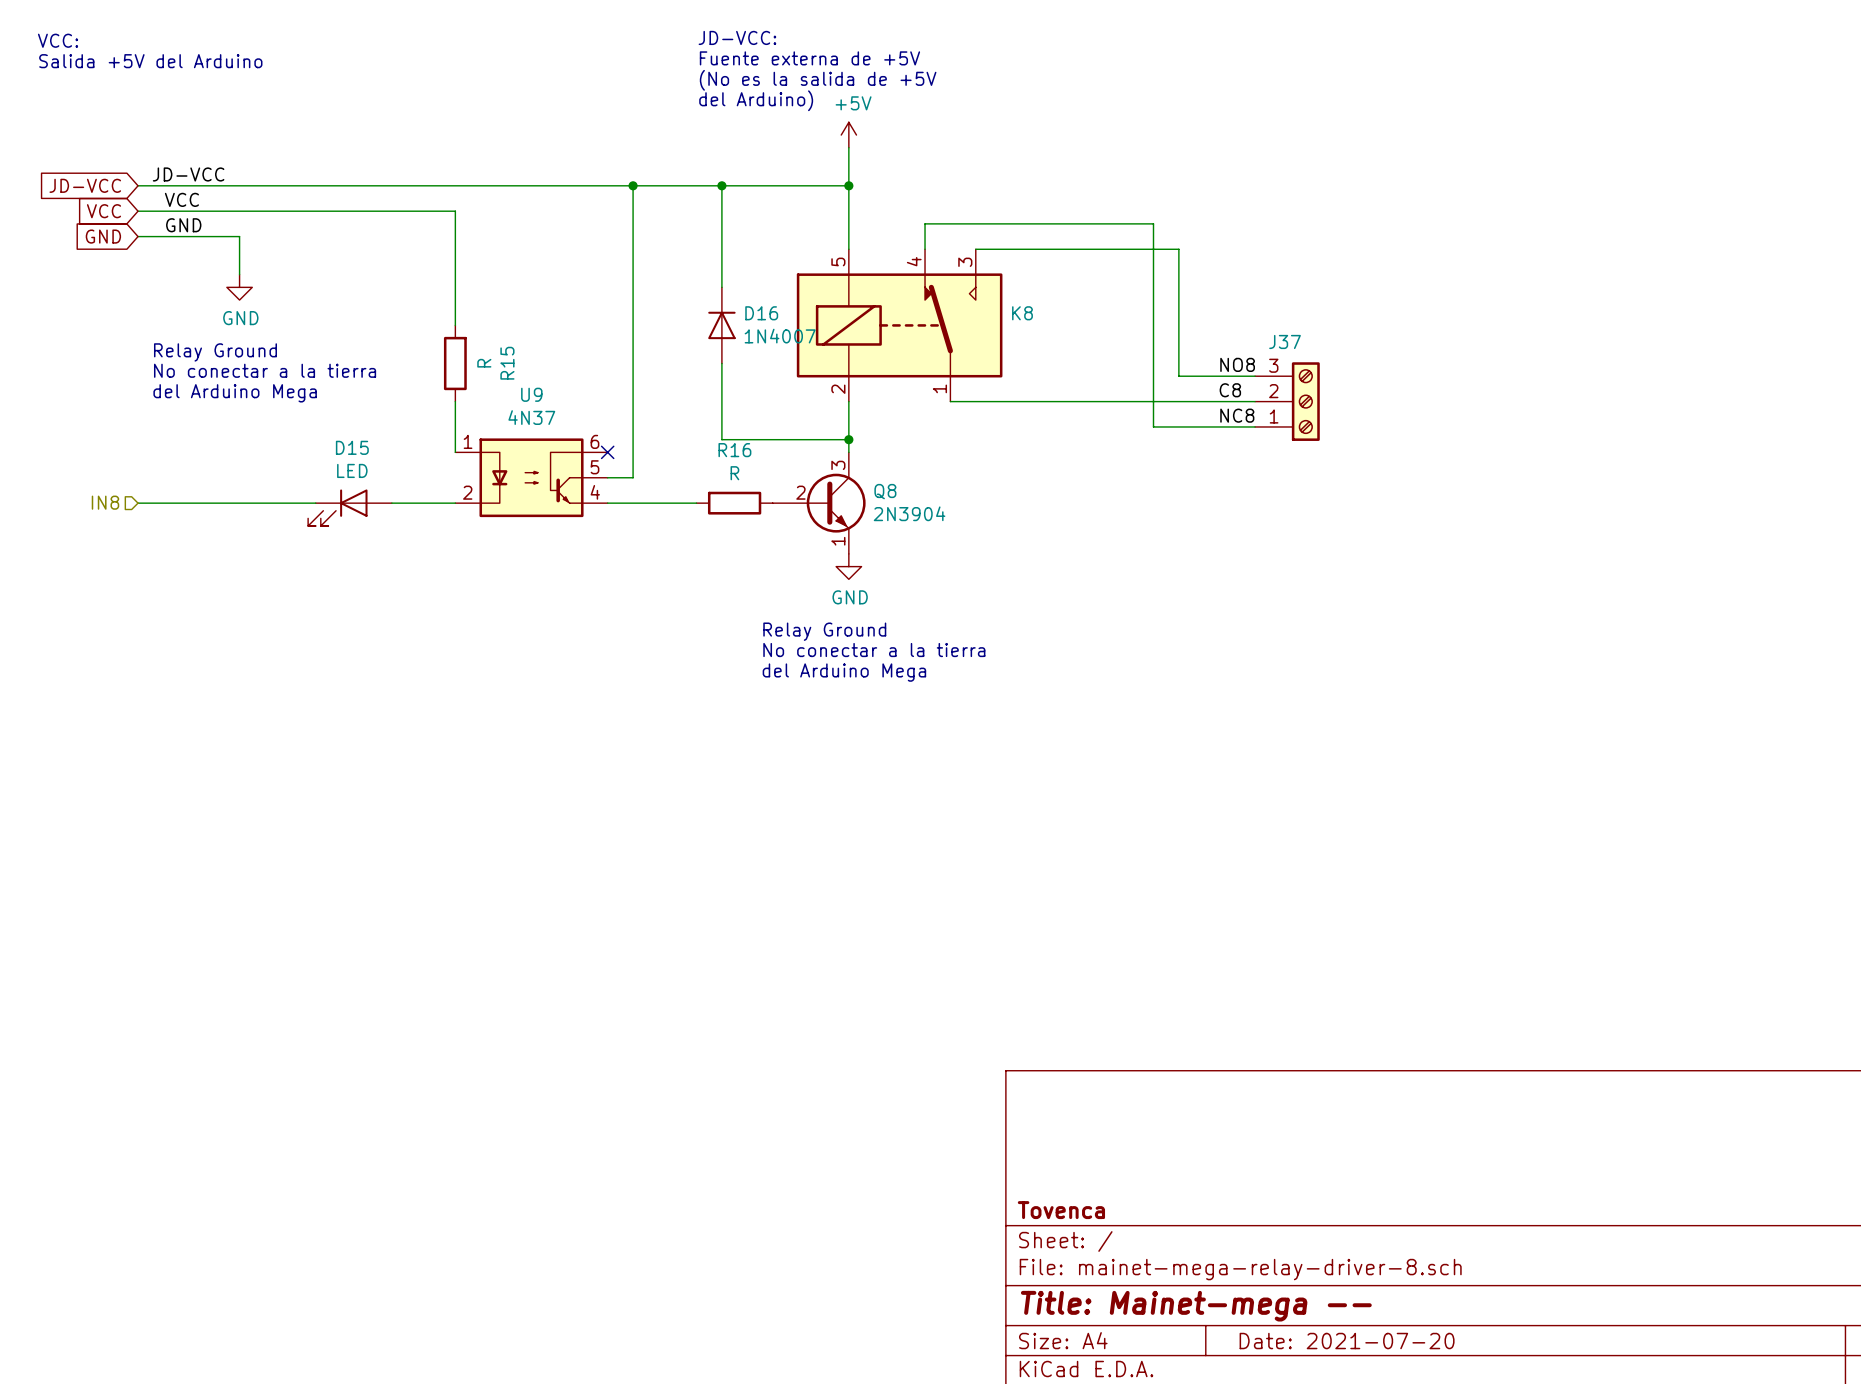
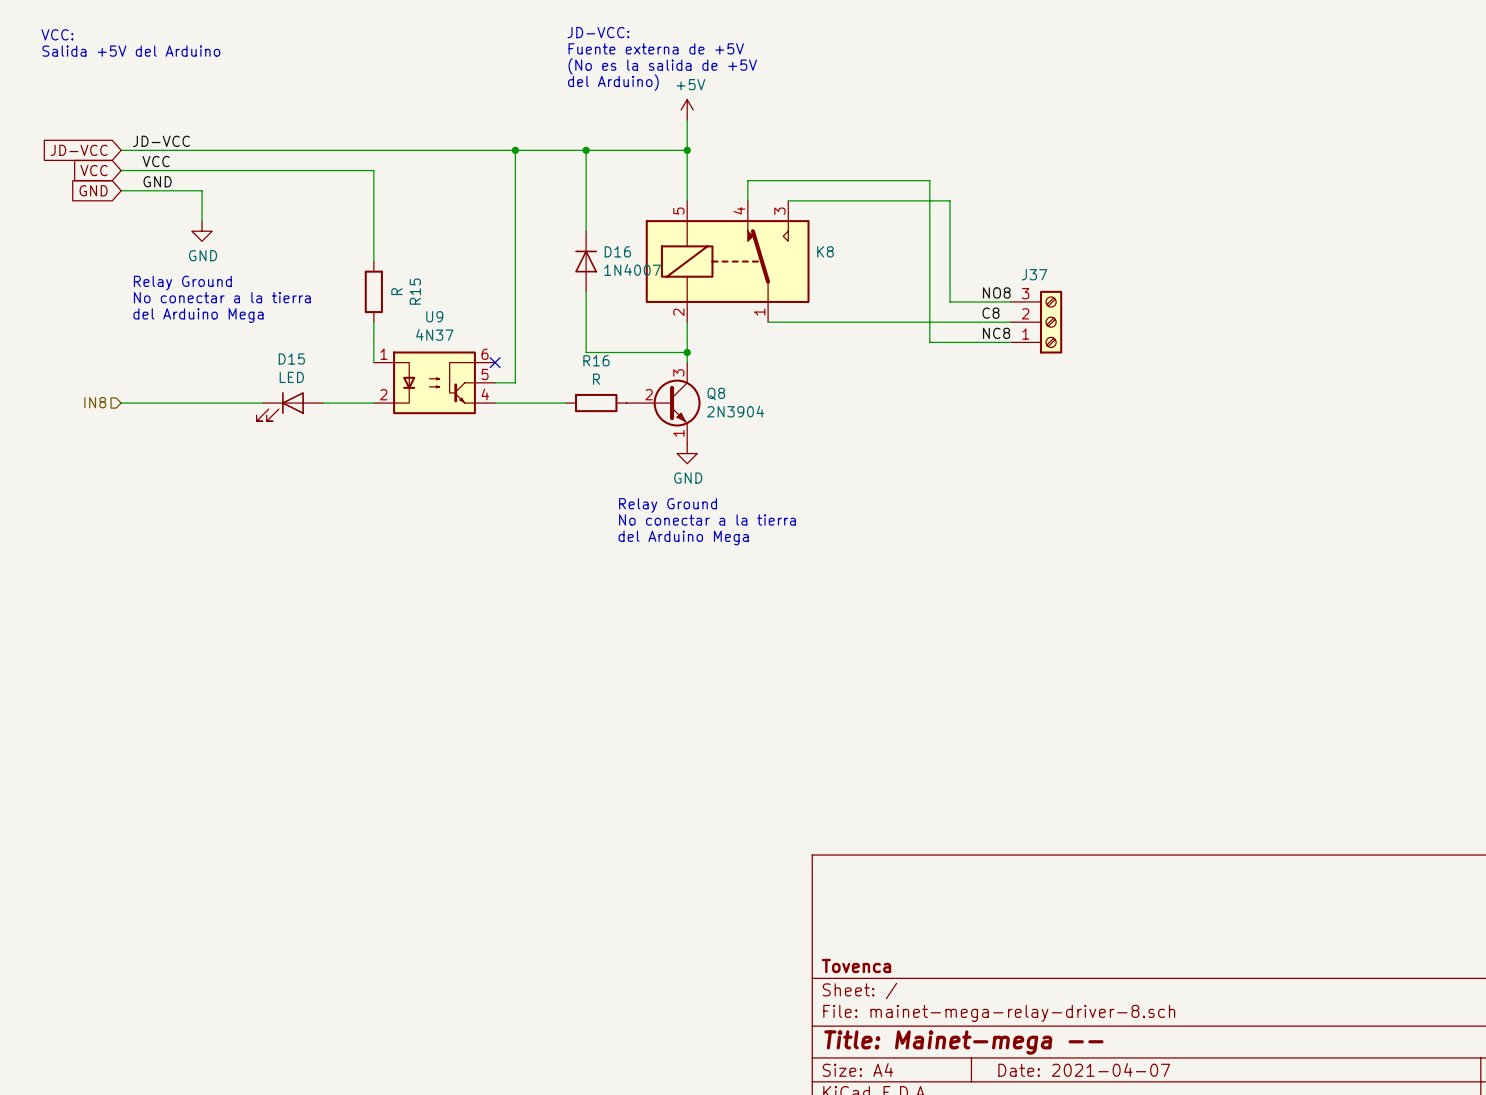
title block: Date: 2021-07-20 (1347, 1341) -> Date: 2021-04-07 (1084, 1069)

